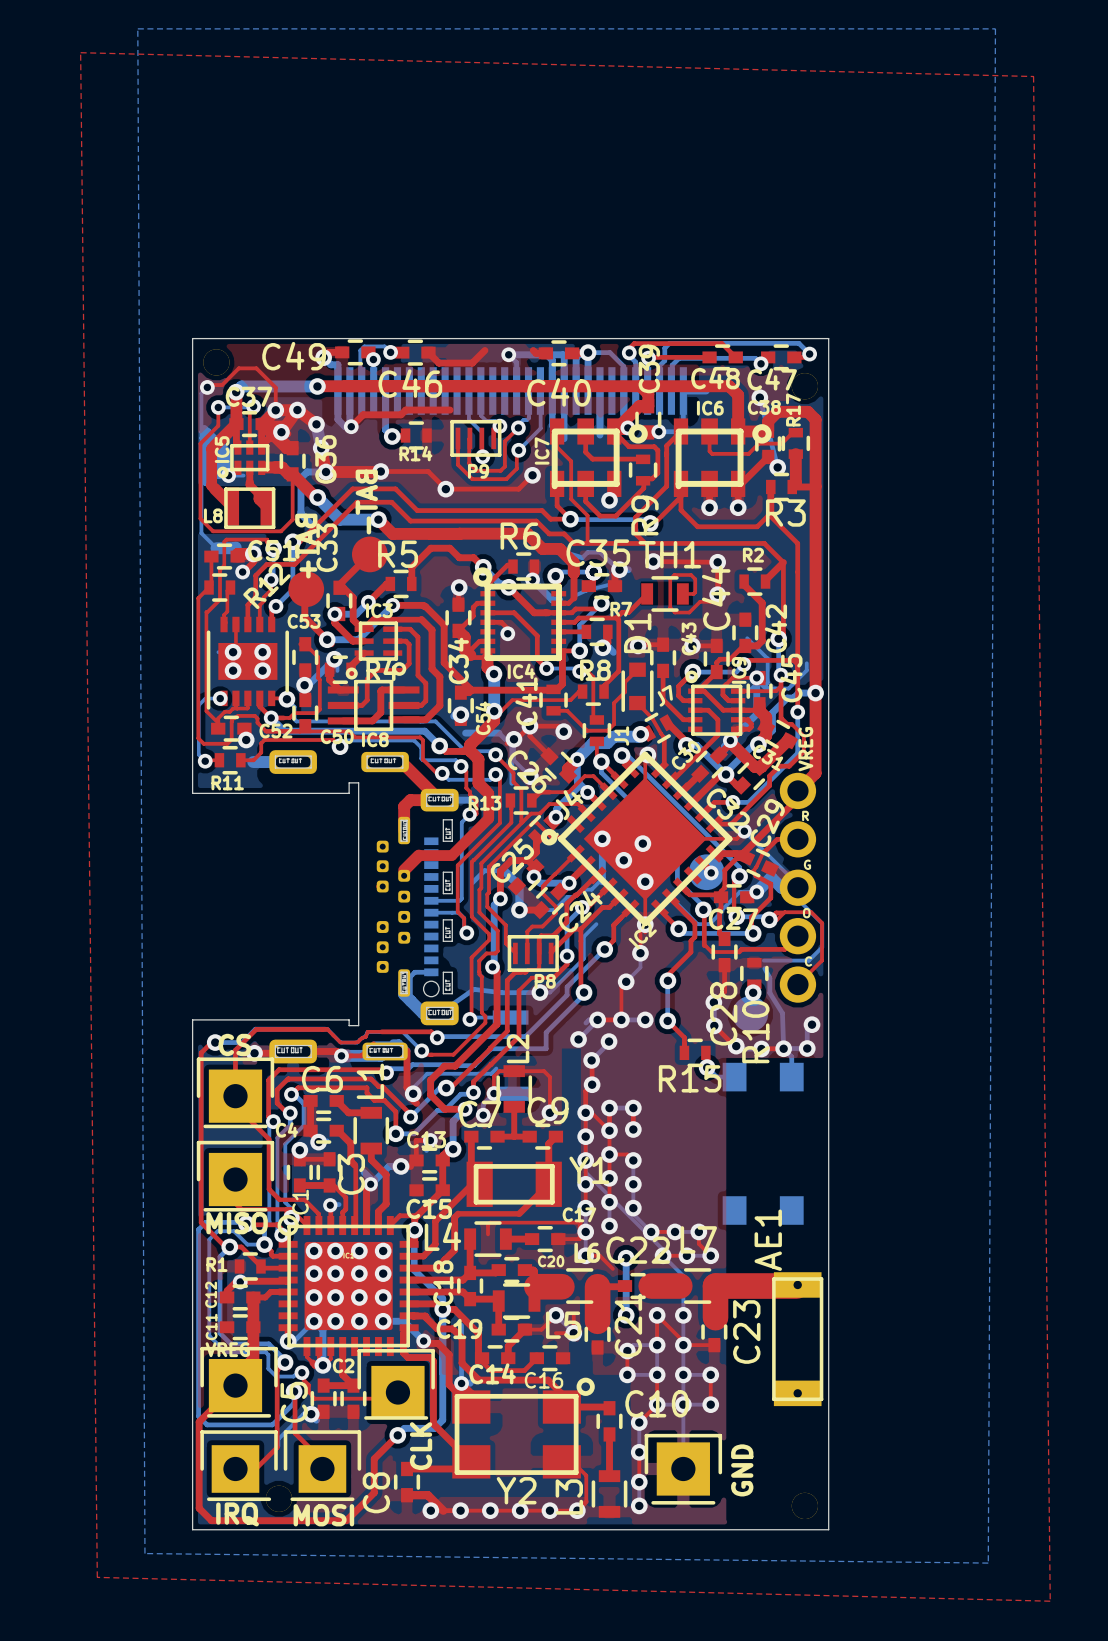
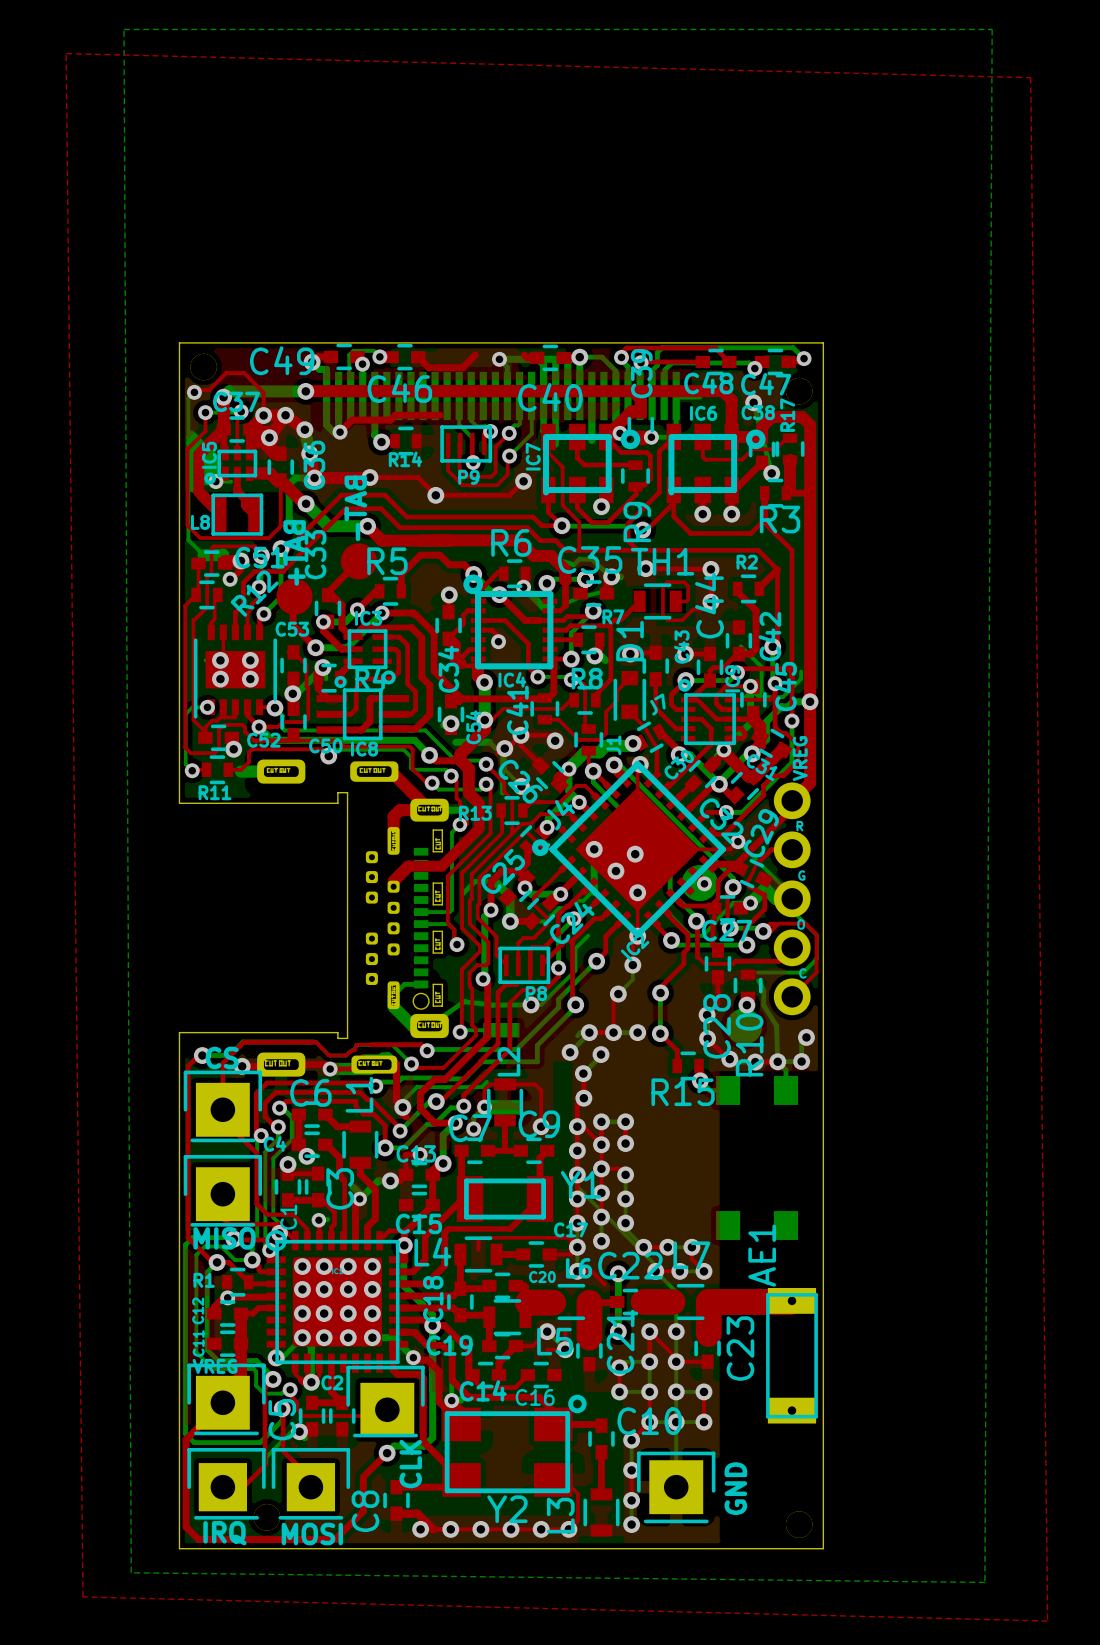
bottom track: (410, 976) (410, 1000) -> none

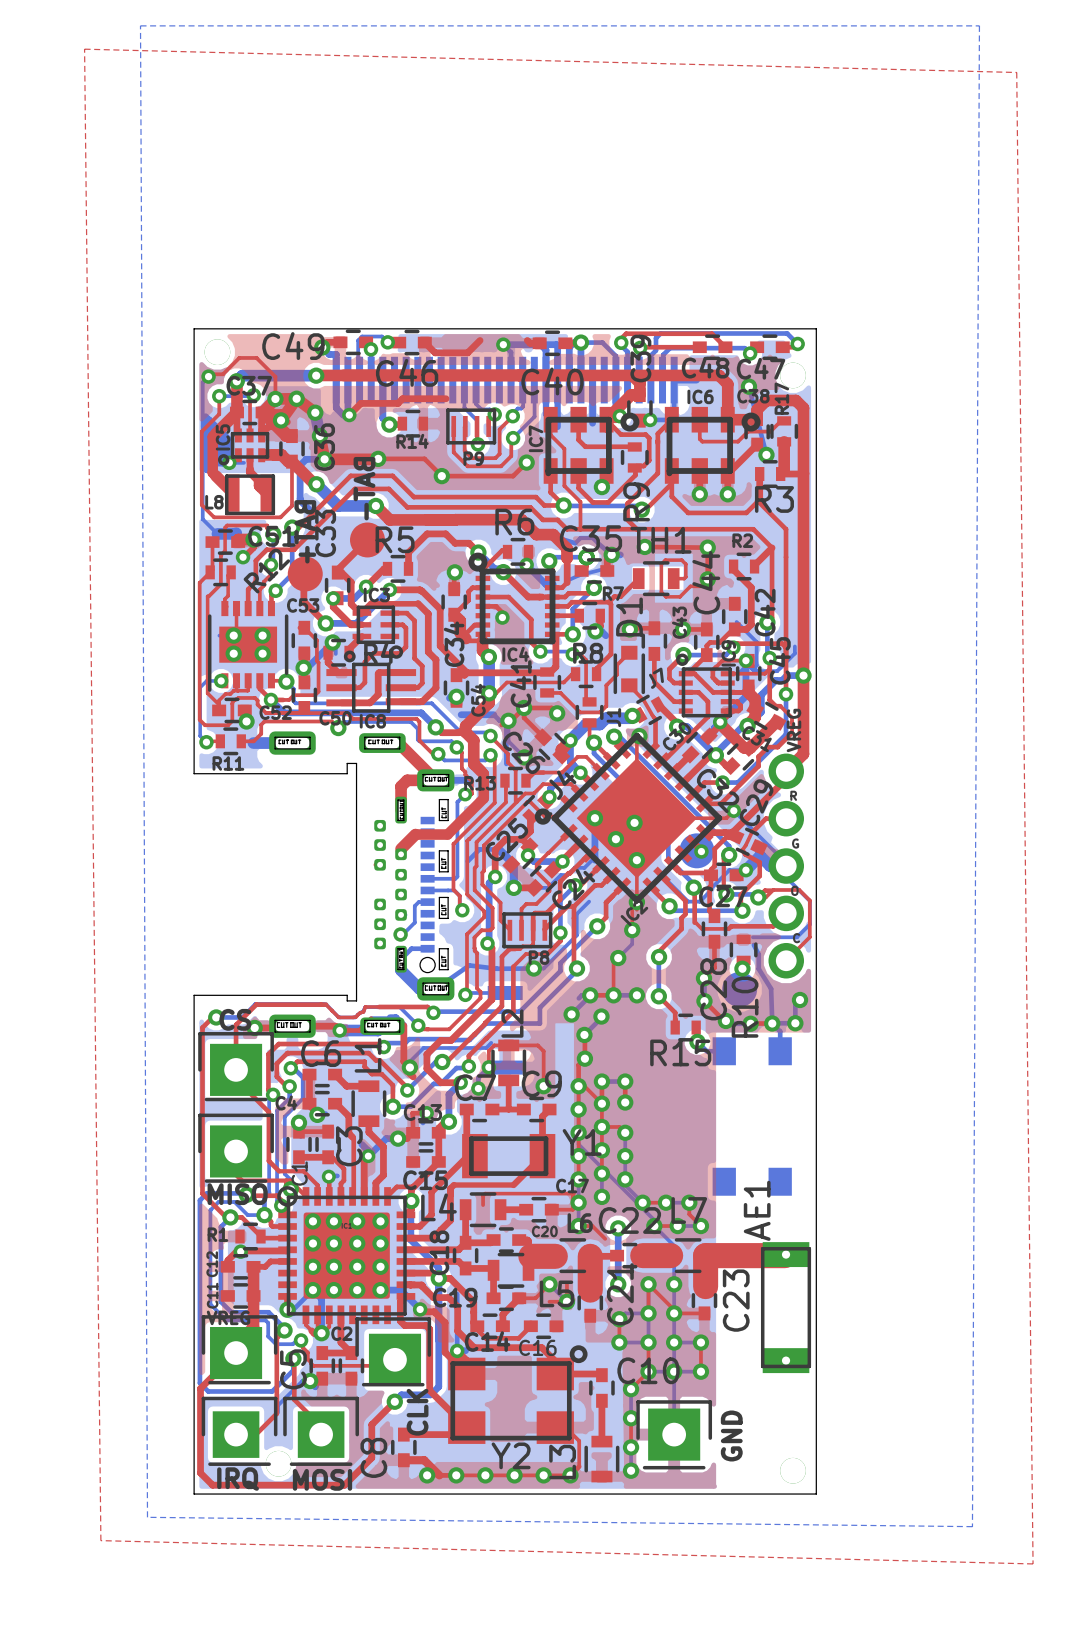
bottom track: none -> (427, 902) (418, 902) (414, 906) (414, 922) (400, 934)
via: none -> (400, 934)

